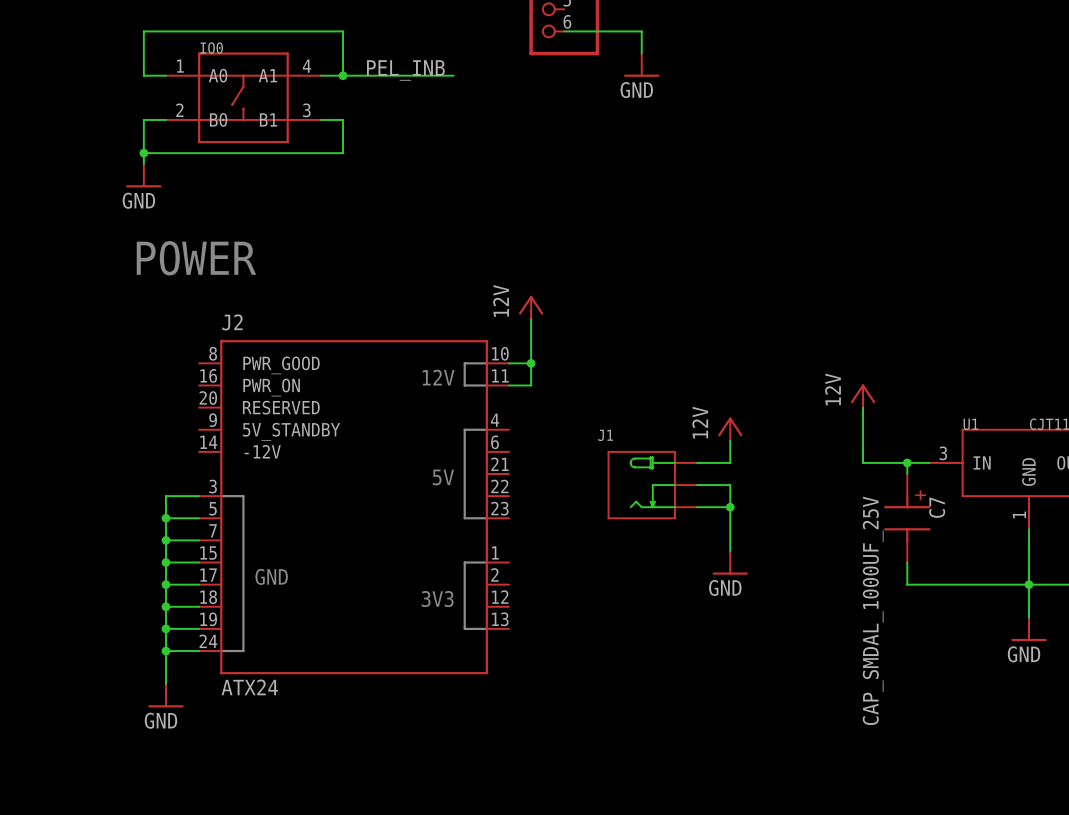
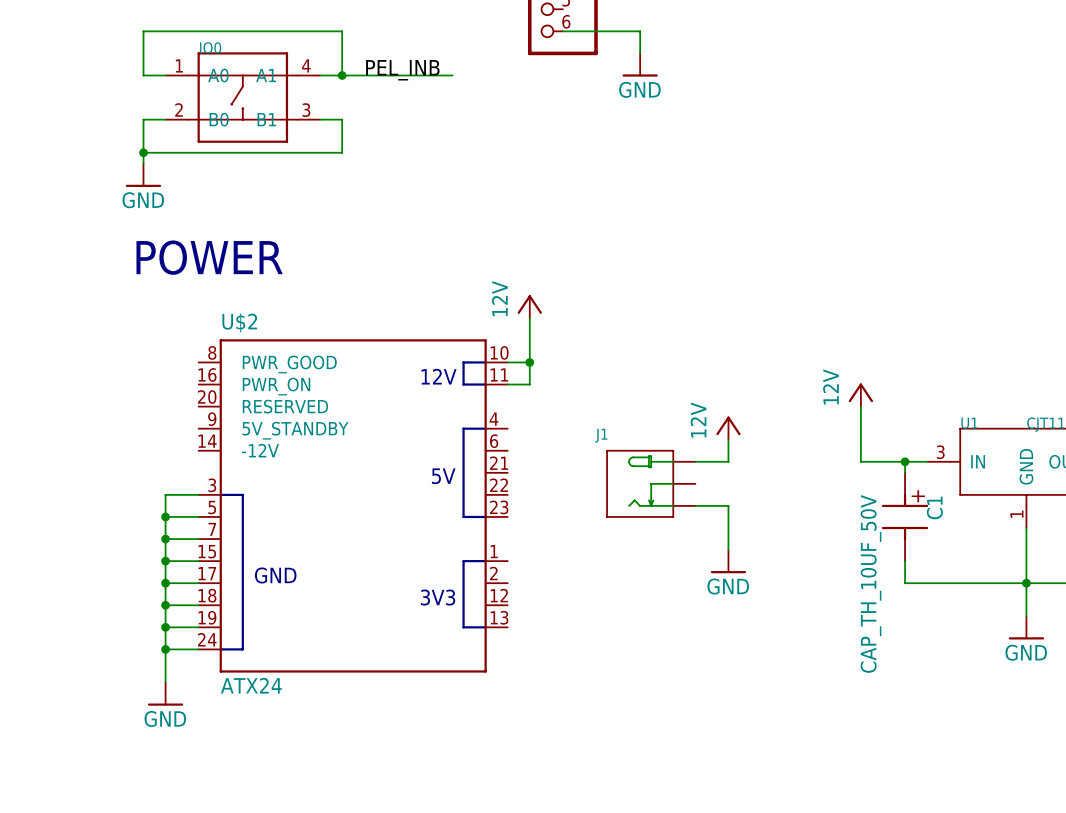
J2 name: J2 (232, 322) -> U$2 (239, 322)
wire: (697, 485) (730, 485) (730, 507) -> none
junction: (730, 507) -> none
C7 name: C7 (937, 507) -> C1 (934, 507)
C7 value: CAP_SMDAL_1000UF_25V (873, 610) -> CAP_TH_10UF_50V (870, 583)

